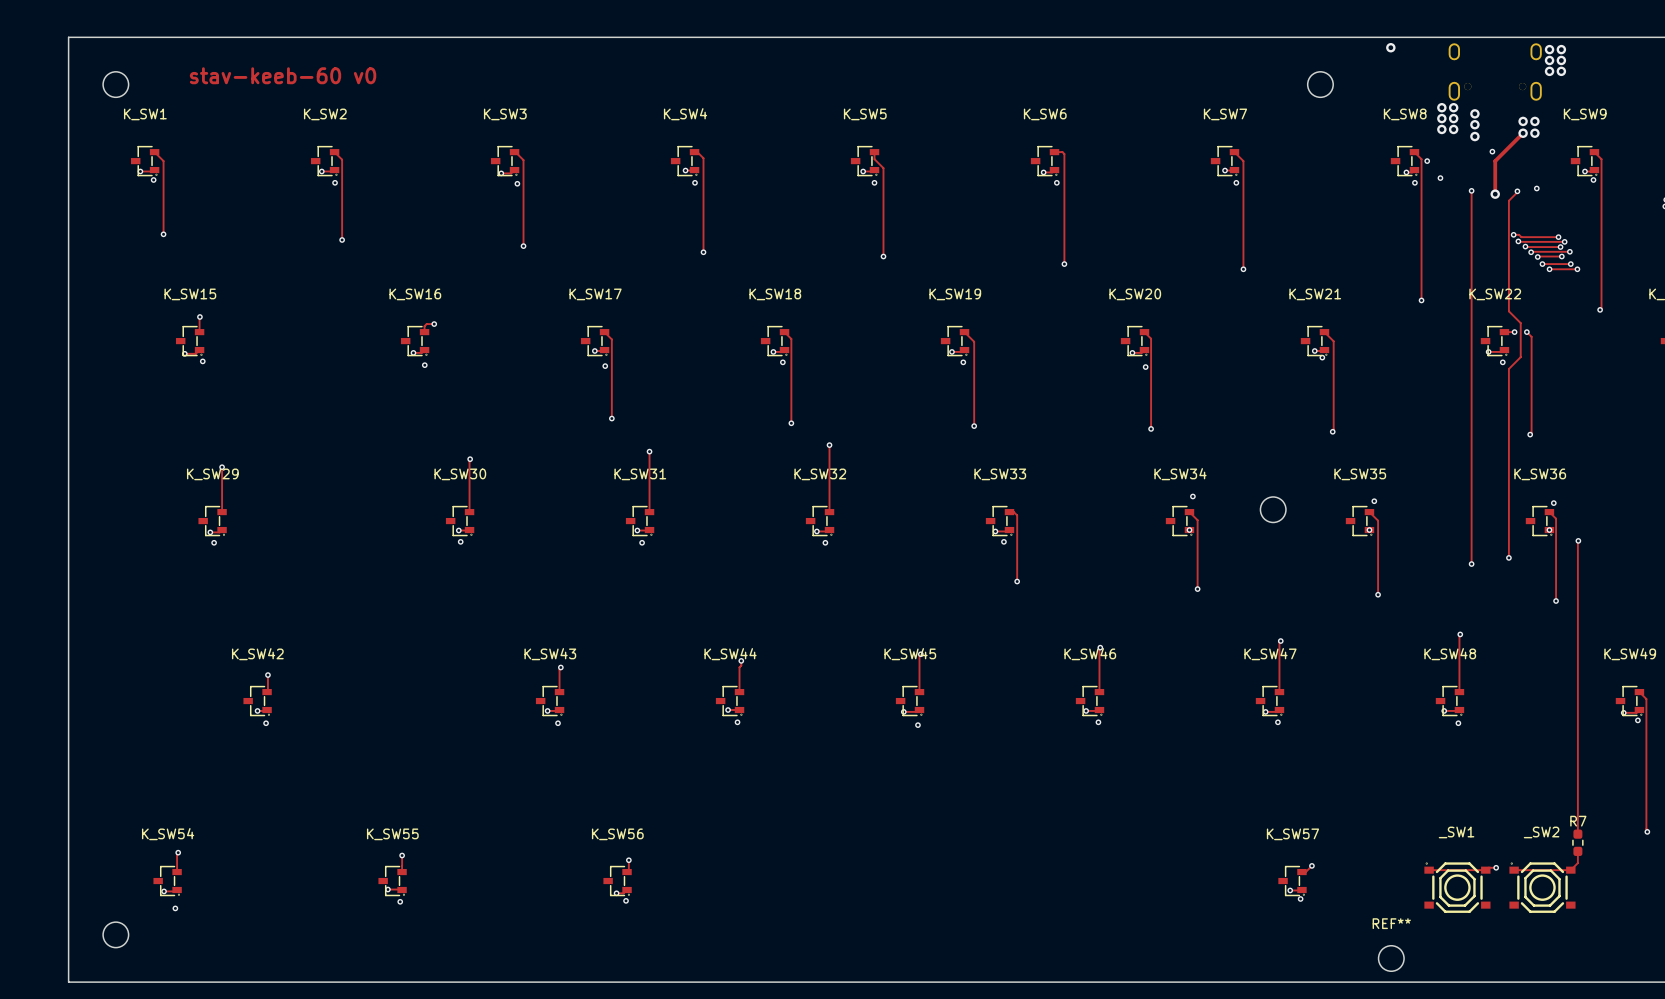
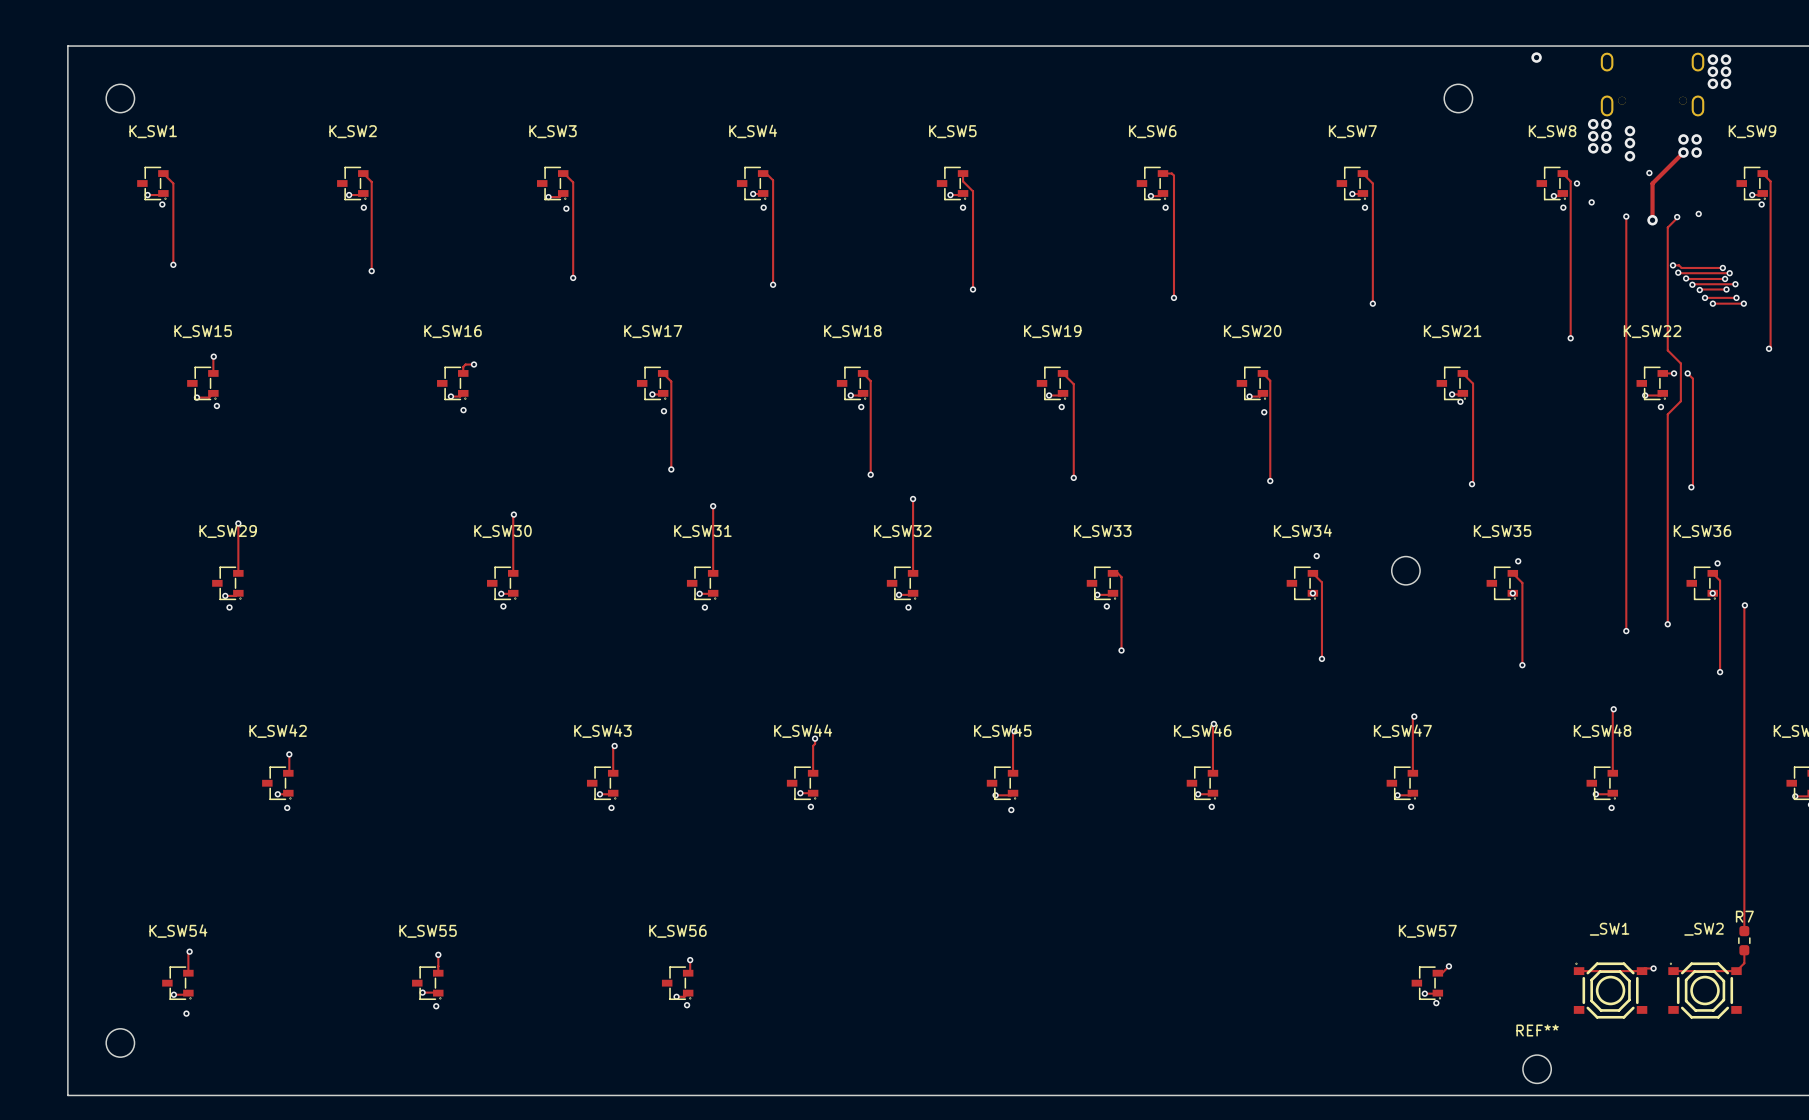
text: stav-keeb-60 v0 (283, 75) -> none

